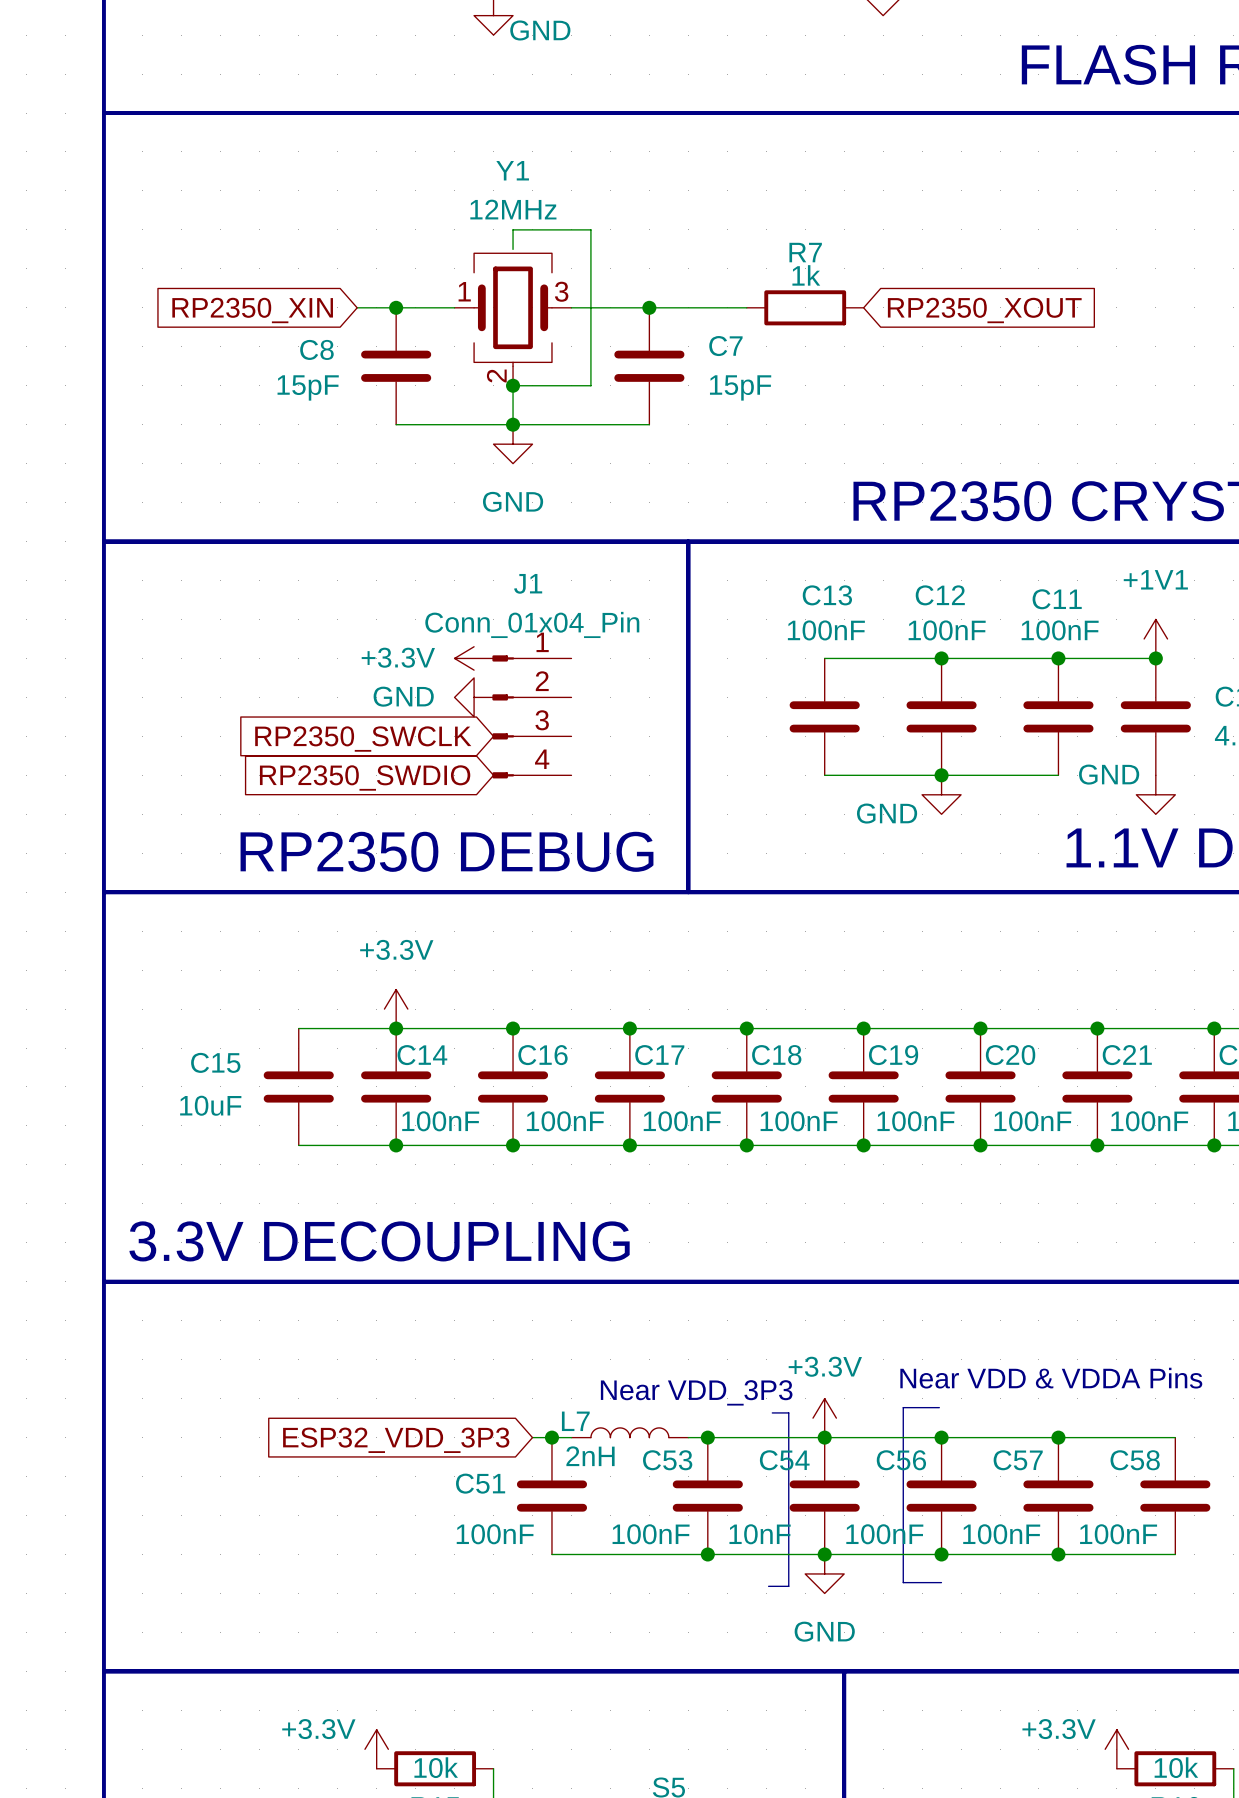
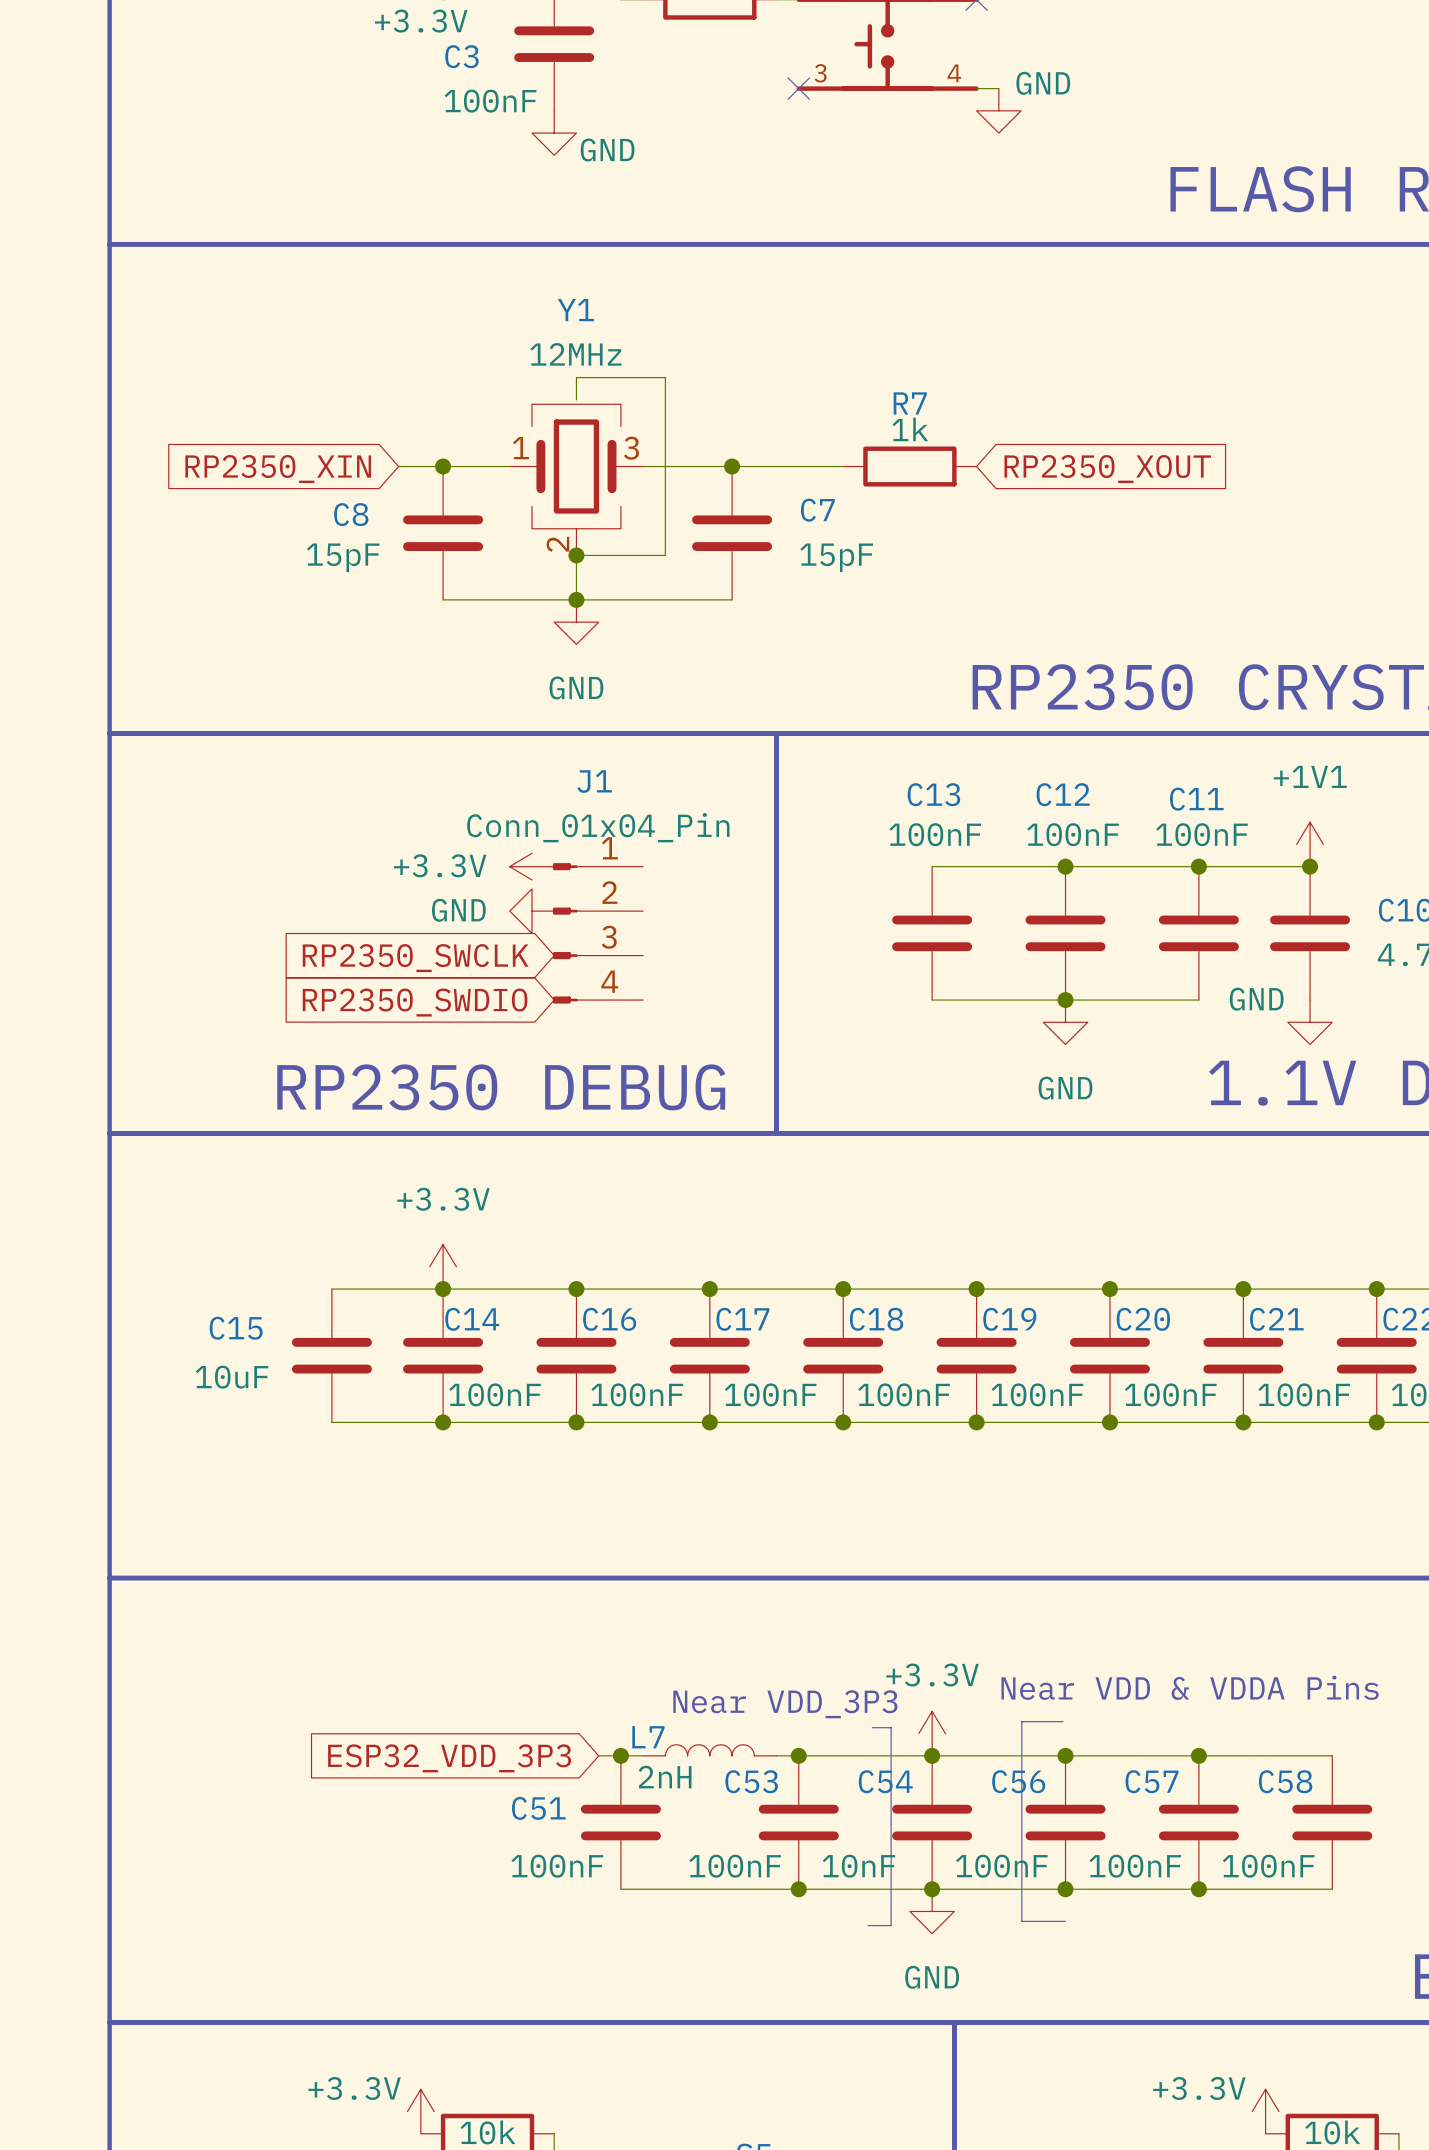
power symbol text position: GND (887, 813) -> GND (1065, 1088)
text: 3.3V DECOUPLING (379, 1241) -> none

